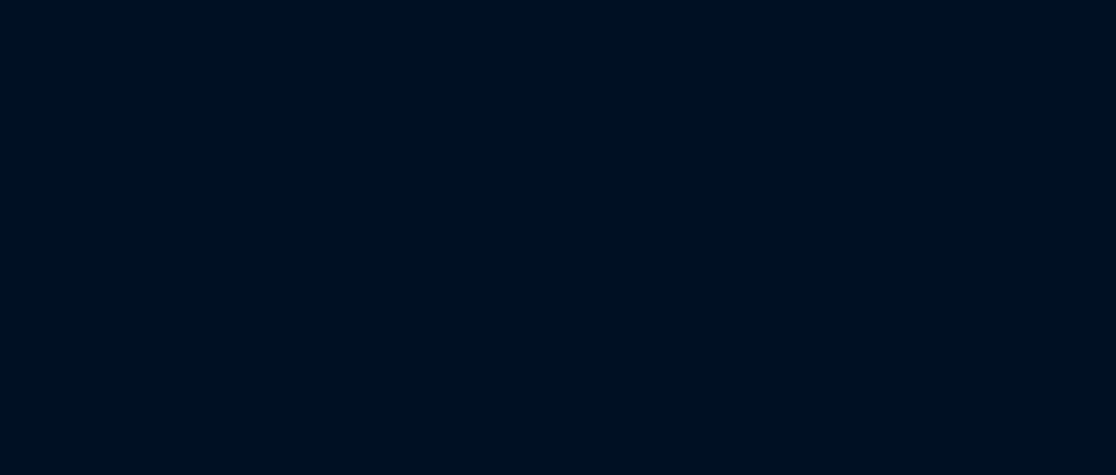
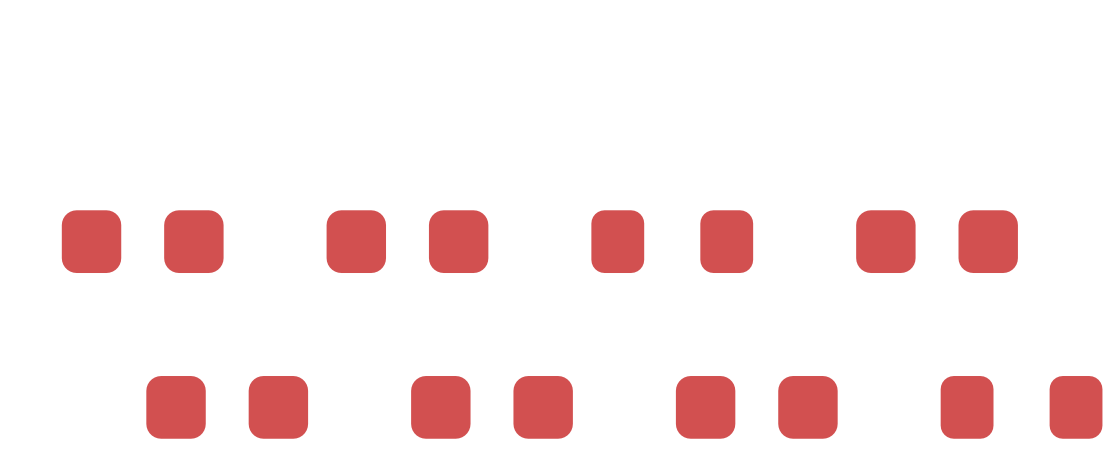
part: none -> (142, 241)
part: none -> (407, 241)
part: none -> (672, 241)
part: none -> (937, 241)
part: none -> (227, 407)
part: none -> (491, 407)
part: none -> (756, 407)
part: none -> (1021, 407)

